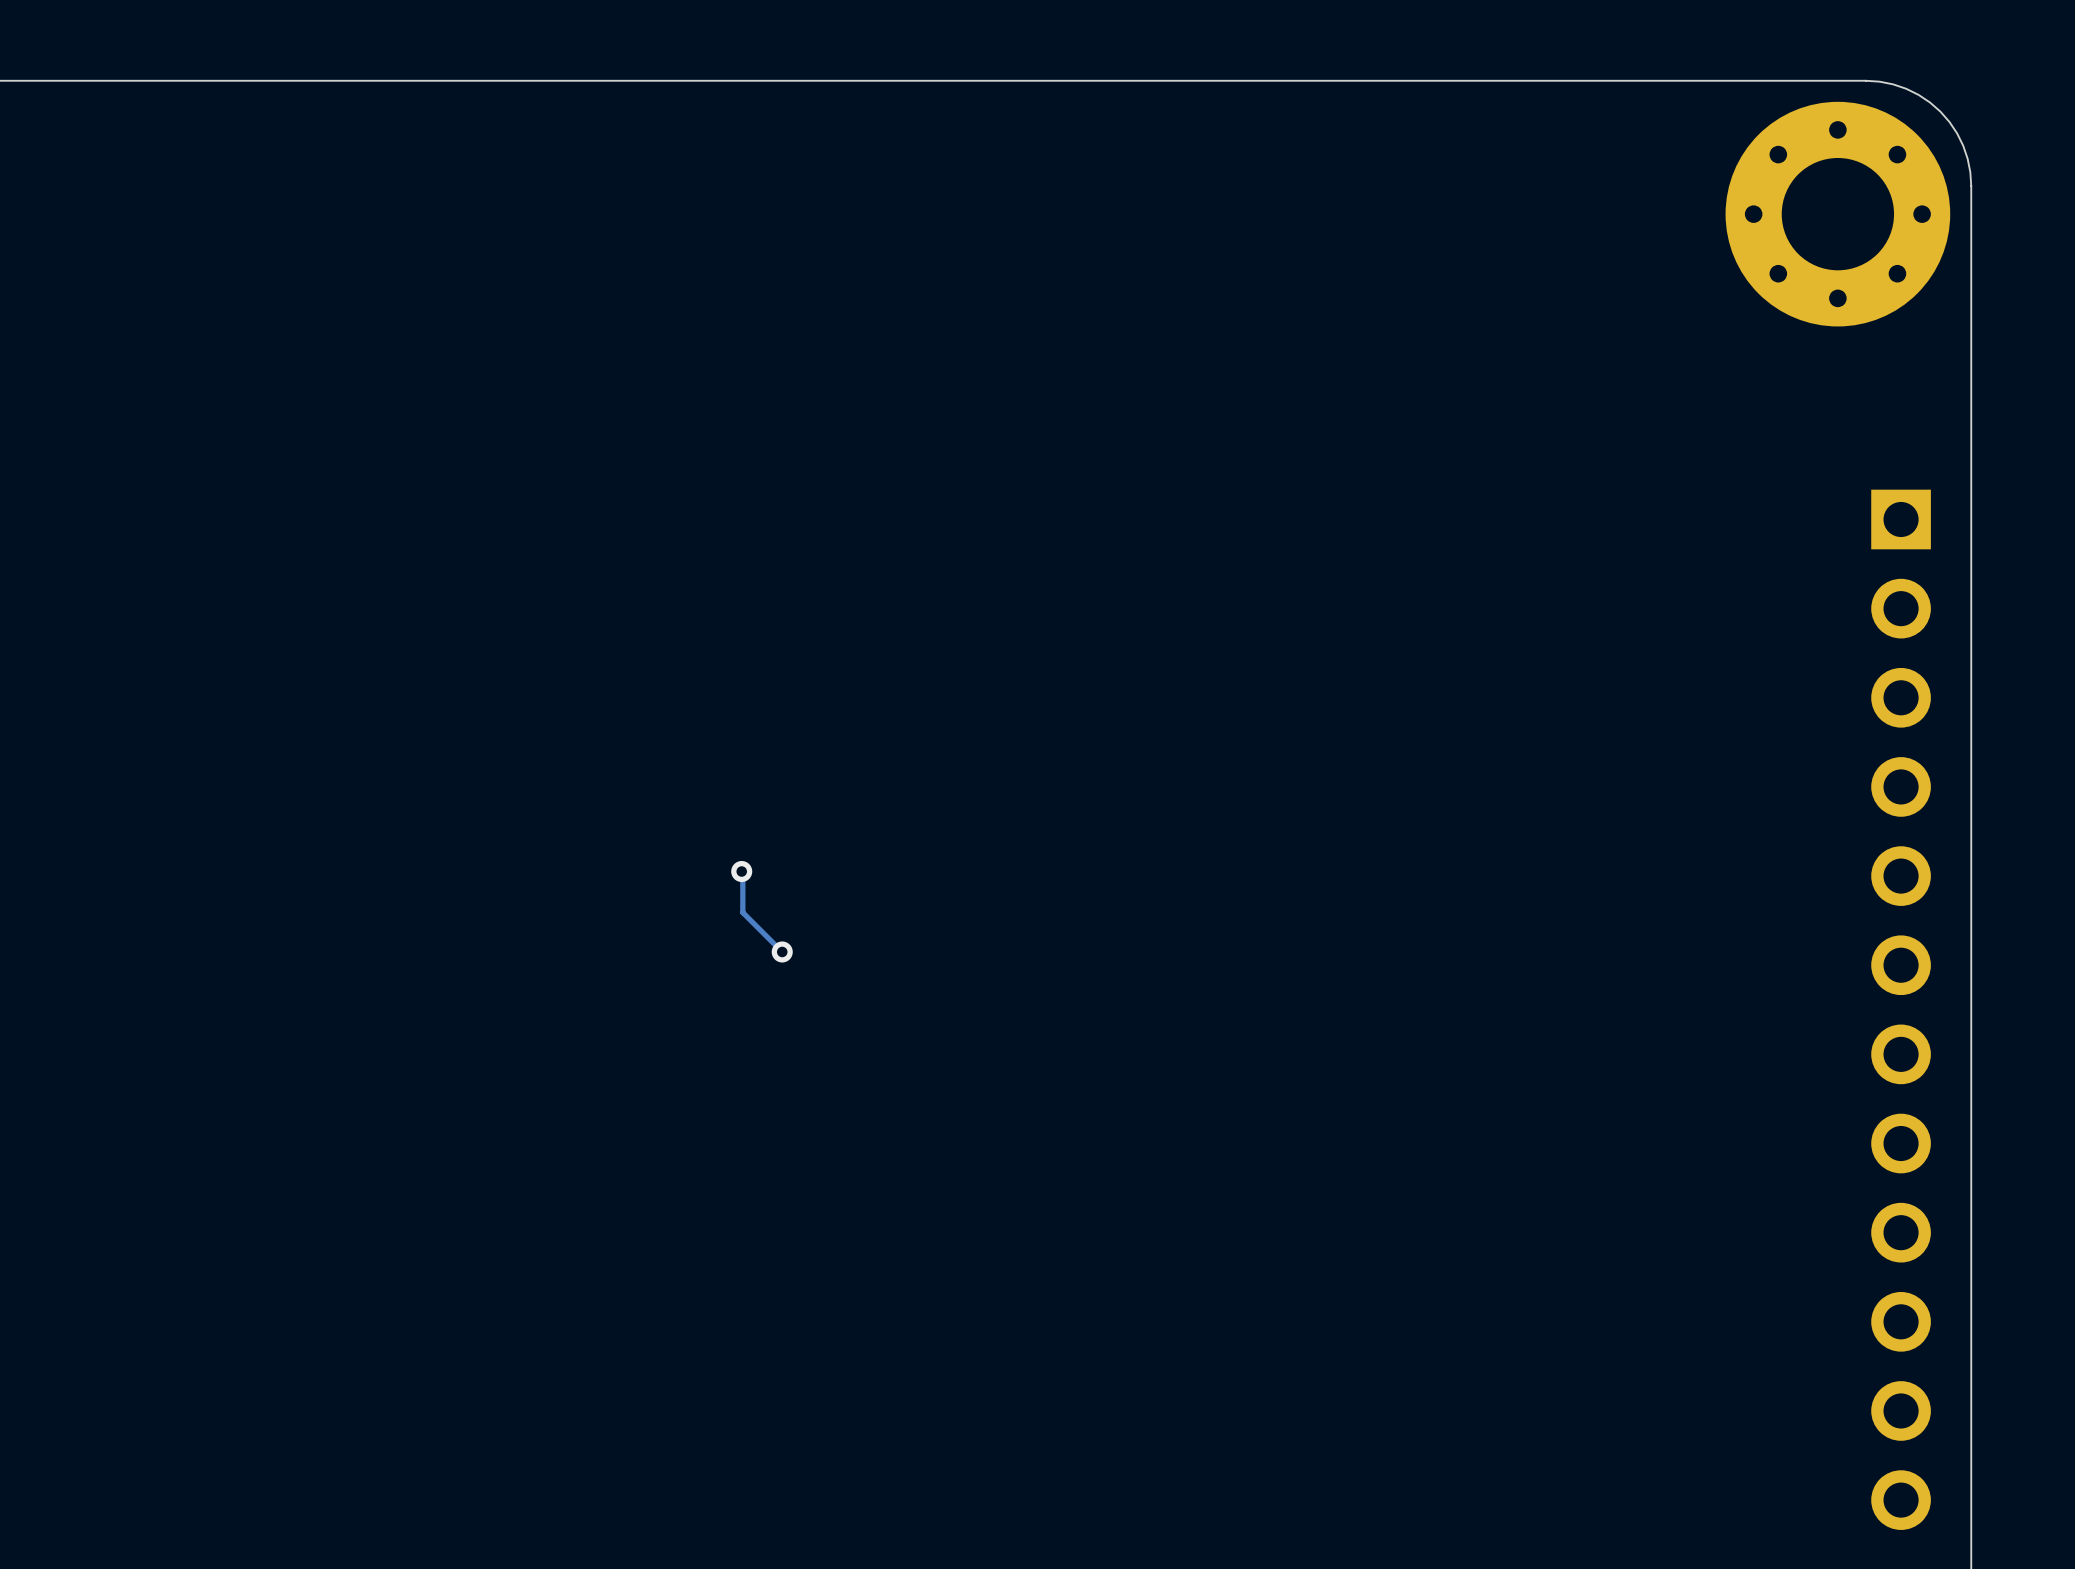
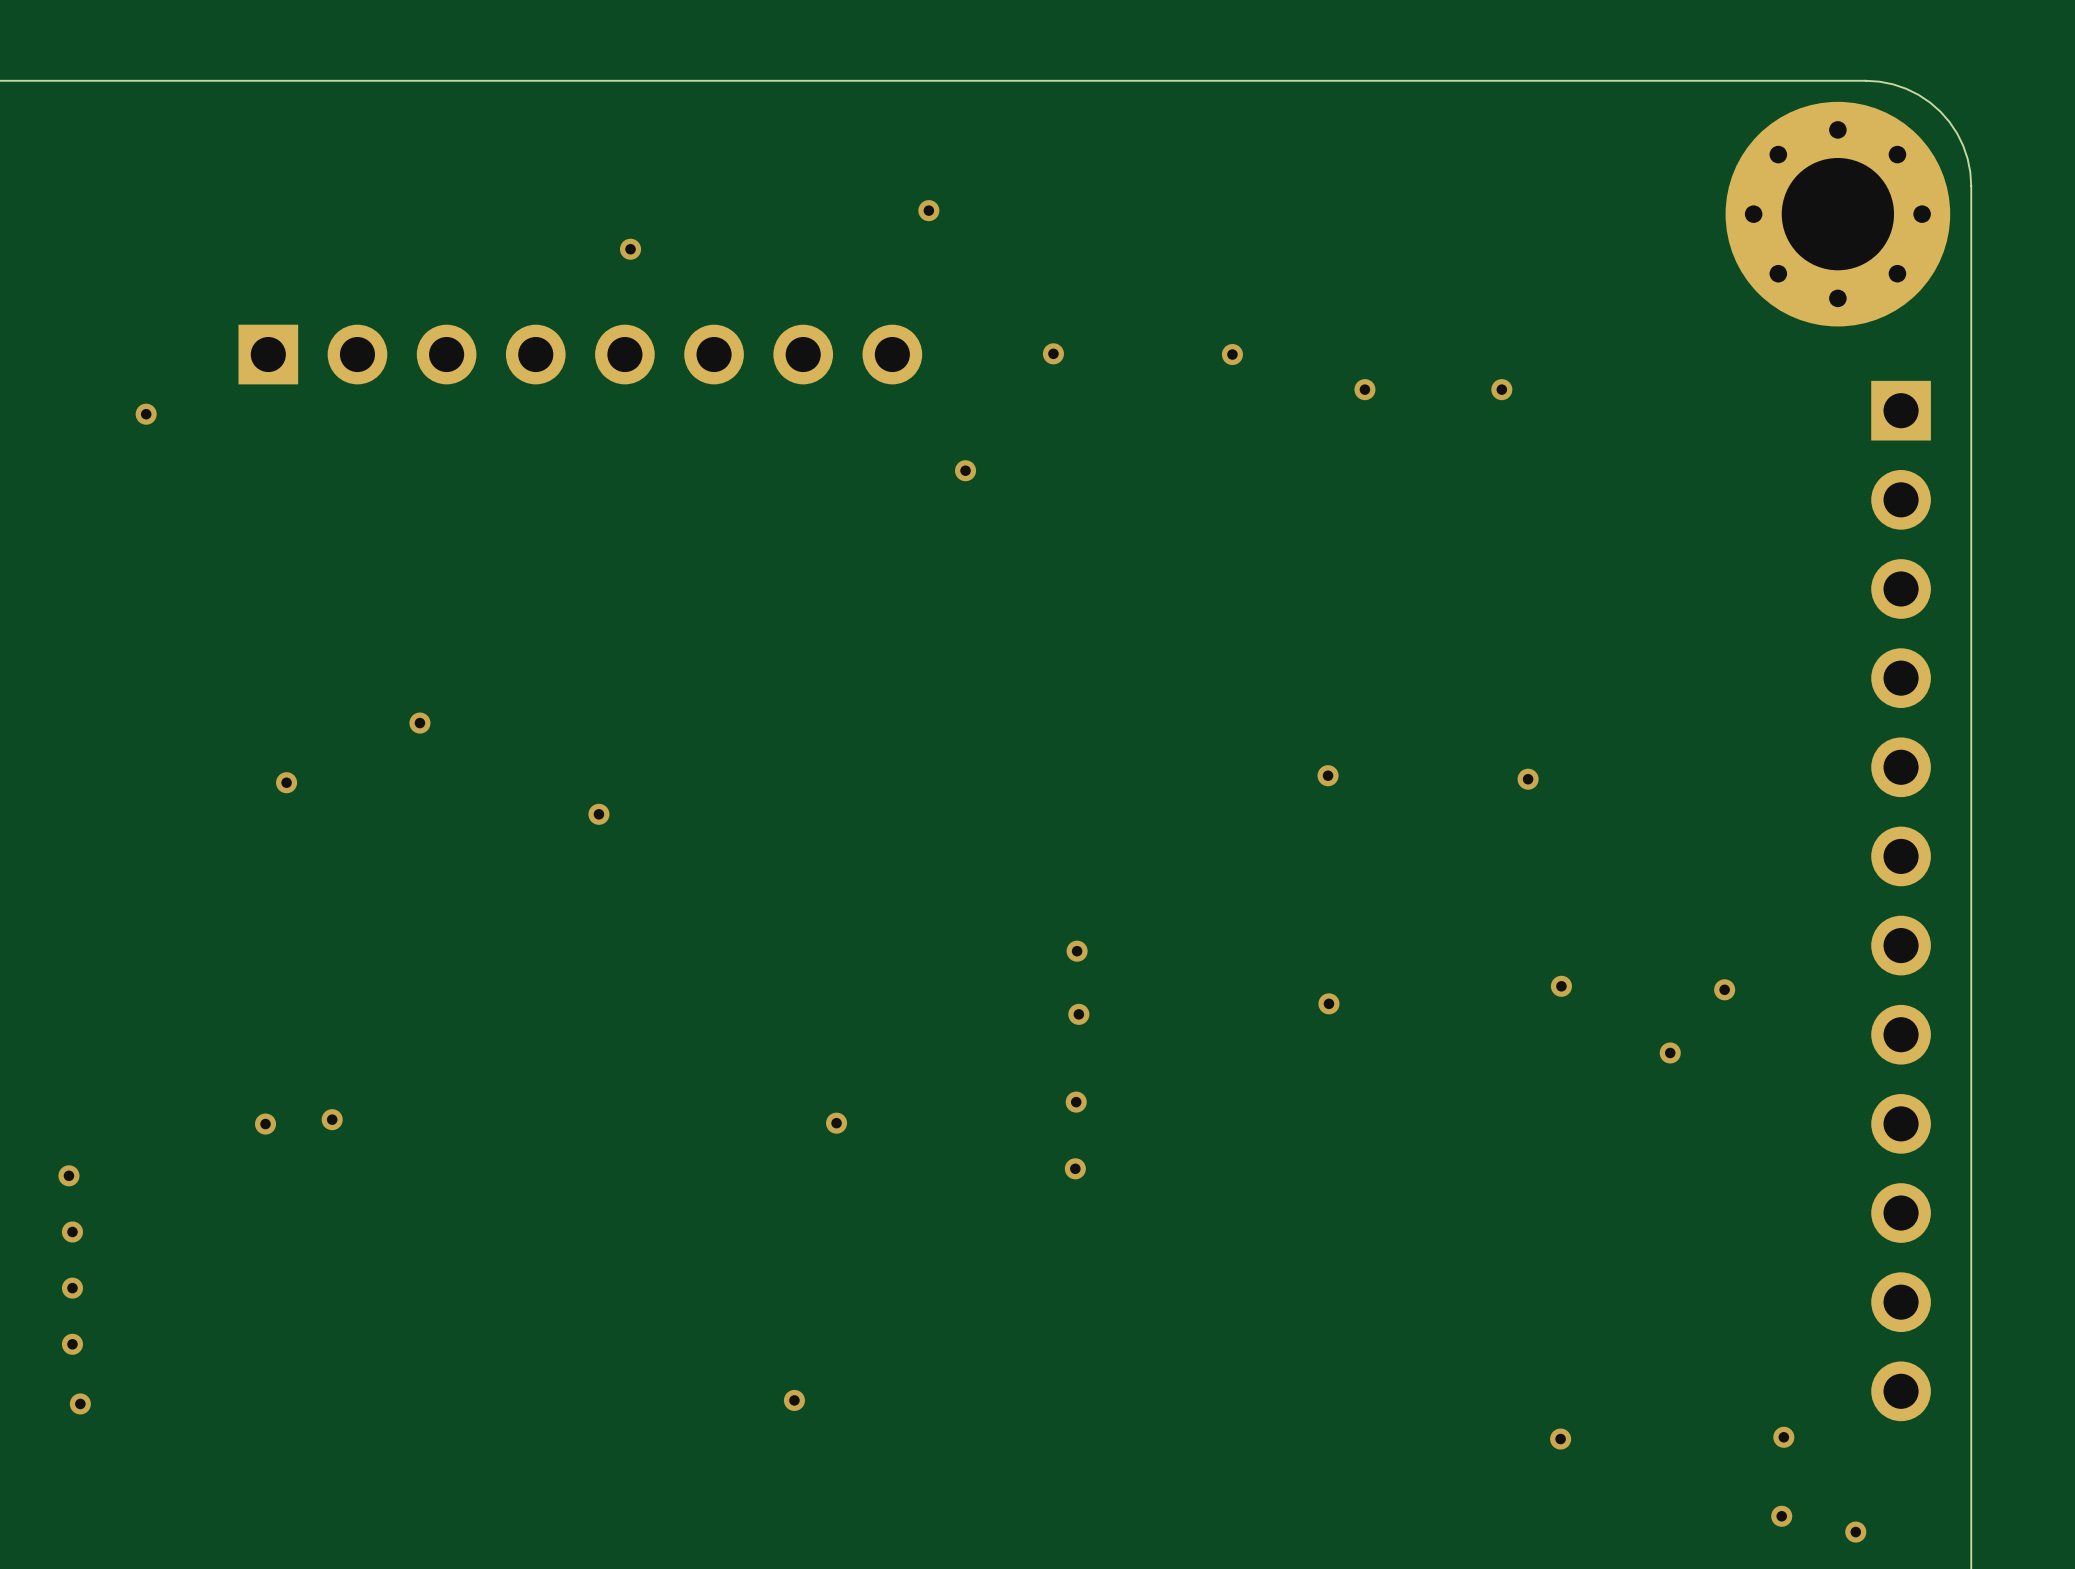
via: none -> (928, 210)
via: none -> (630, 249)
via: none -> (1053, 353)
part: none -> (580, 354)
via: none -> (1232, 354)
via: none -> (1364, 389)
via: none -> (1501, 389)
via: none -> (146, 414)
via: none -> (965, 470)
via: none -> (419, 723)
via: none -> (1328, 775)
via: none -> (1528, 779)
via: none -> (286, 782)
via: none -> (598, 814)
track: (741, 871) (742, 912) (782, 951) -> none
via: (741, 871) -> none
via: (782, 951) -> none
via: none -> (1077, 951)
via: none -> (1561, 986)
via: none -> (1724, 989)
via: none -> (1328, 1003)
part position: (1901, 1009) -> (1901, 901)
via: none -> (1078, 1014)
via: none -> (1670, 1052)
via: none -> (1076, 1102)
via: none -> (332, 1119)
via: none -> (836, 1123)
via: none -> (265, 1124)
via: none -> (1075, 1168)
via: none -> (68, 1175)
via: none -> (72, 1231)
via: none -> (72, 1288)
via: none -> (72, 1344)
via: none -> (794, 1400)
via: none -> (80, 1403)
via: none -> (1783, 1437)
via: none -> (1560, 1439)
via: none -> (1781, 1516)
via: none -> (1855, 1532)

